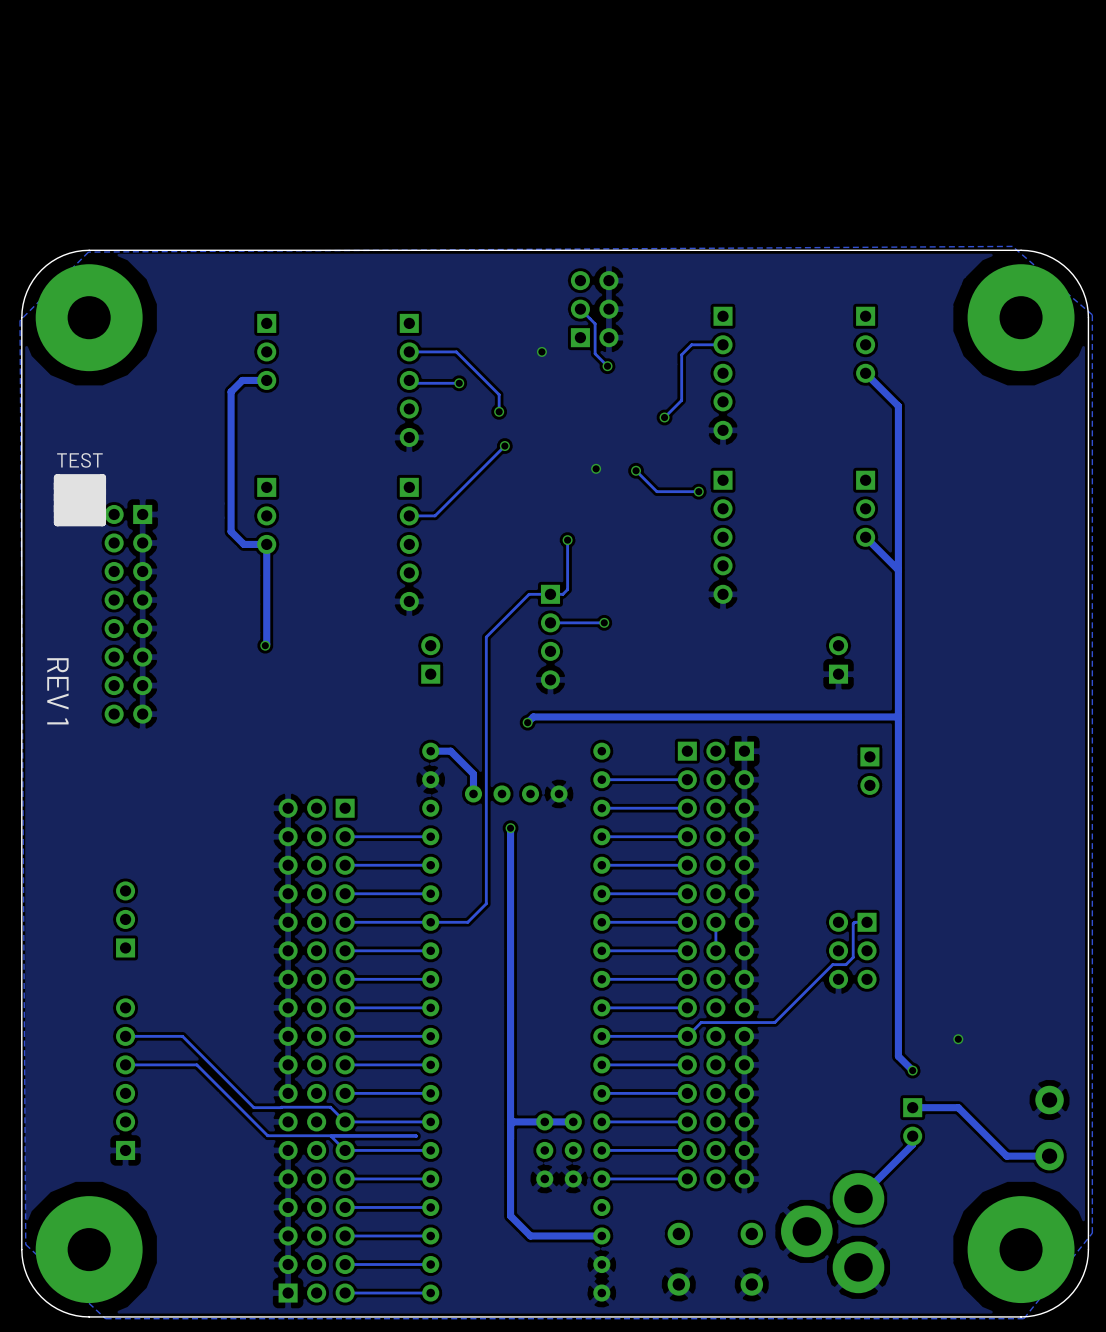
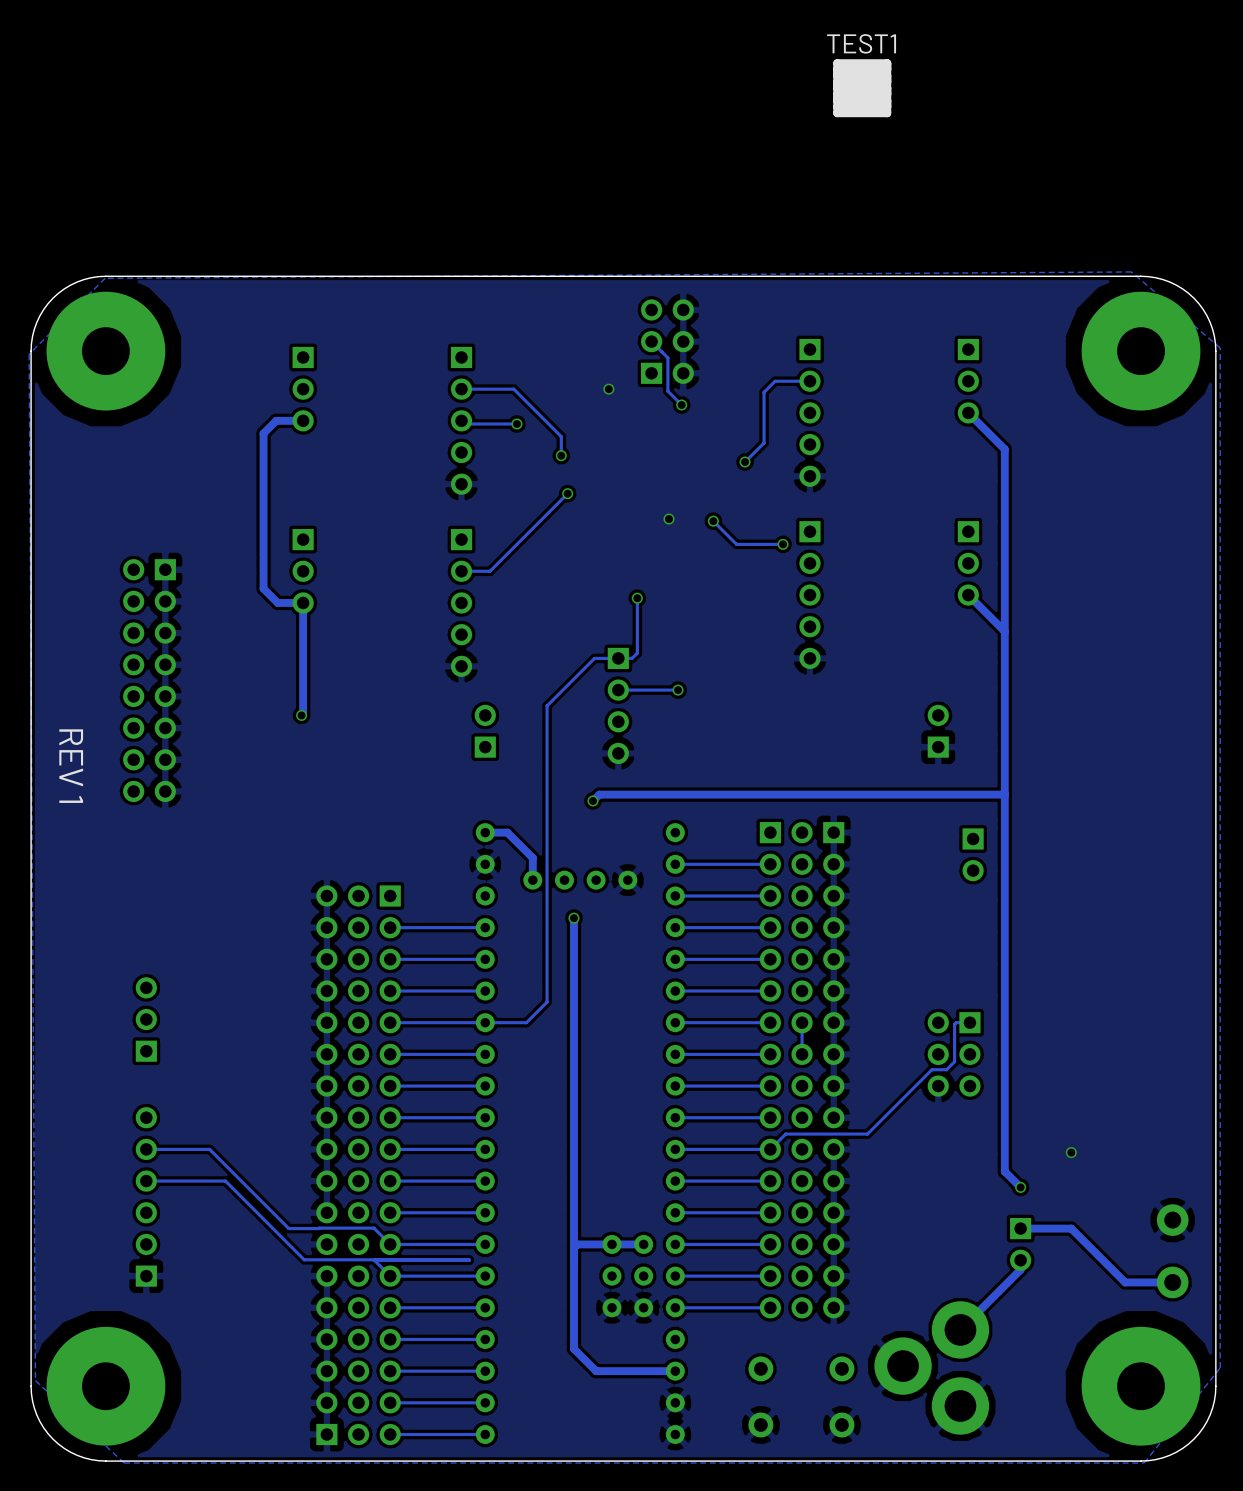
TEST1: none -> (862, 88)
TEST: (79, 500) -> none

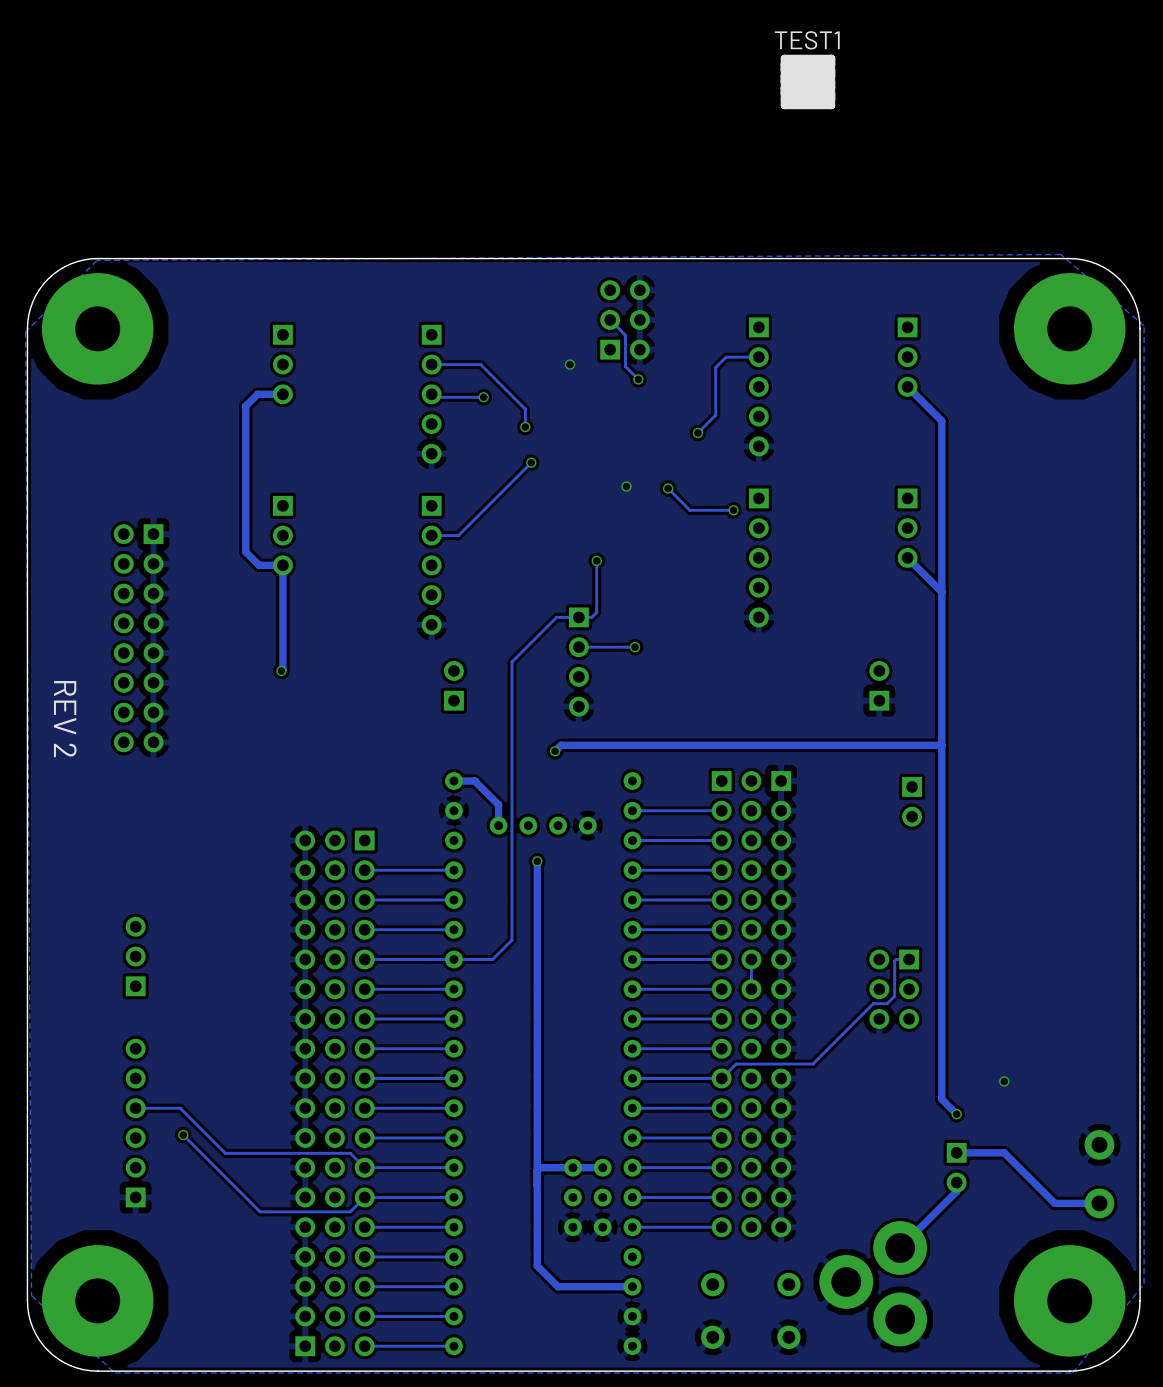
text: REV 1 (71, 766) -> REV 2 (65, 719)
track: (146, 1149) (209, 1149) (288, 1228) (374, 1229) -> (180, 1108) (225, 1153) (350, 1153)
track: (193, 1181) (225, 1181) (304, 1259) (469, 1260) (374, 1260) (390, 1276) -> (183, 1135) (260, 1211) (350, 1211) (364, 1197)
via: none -> (183, 1135)

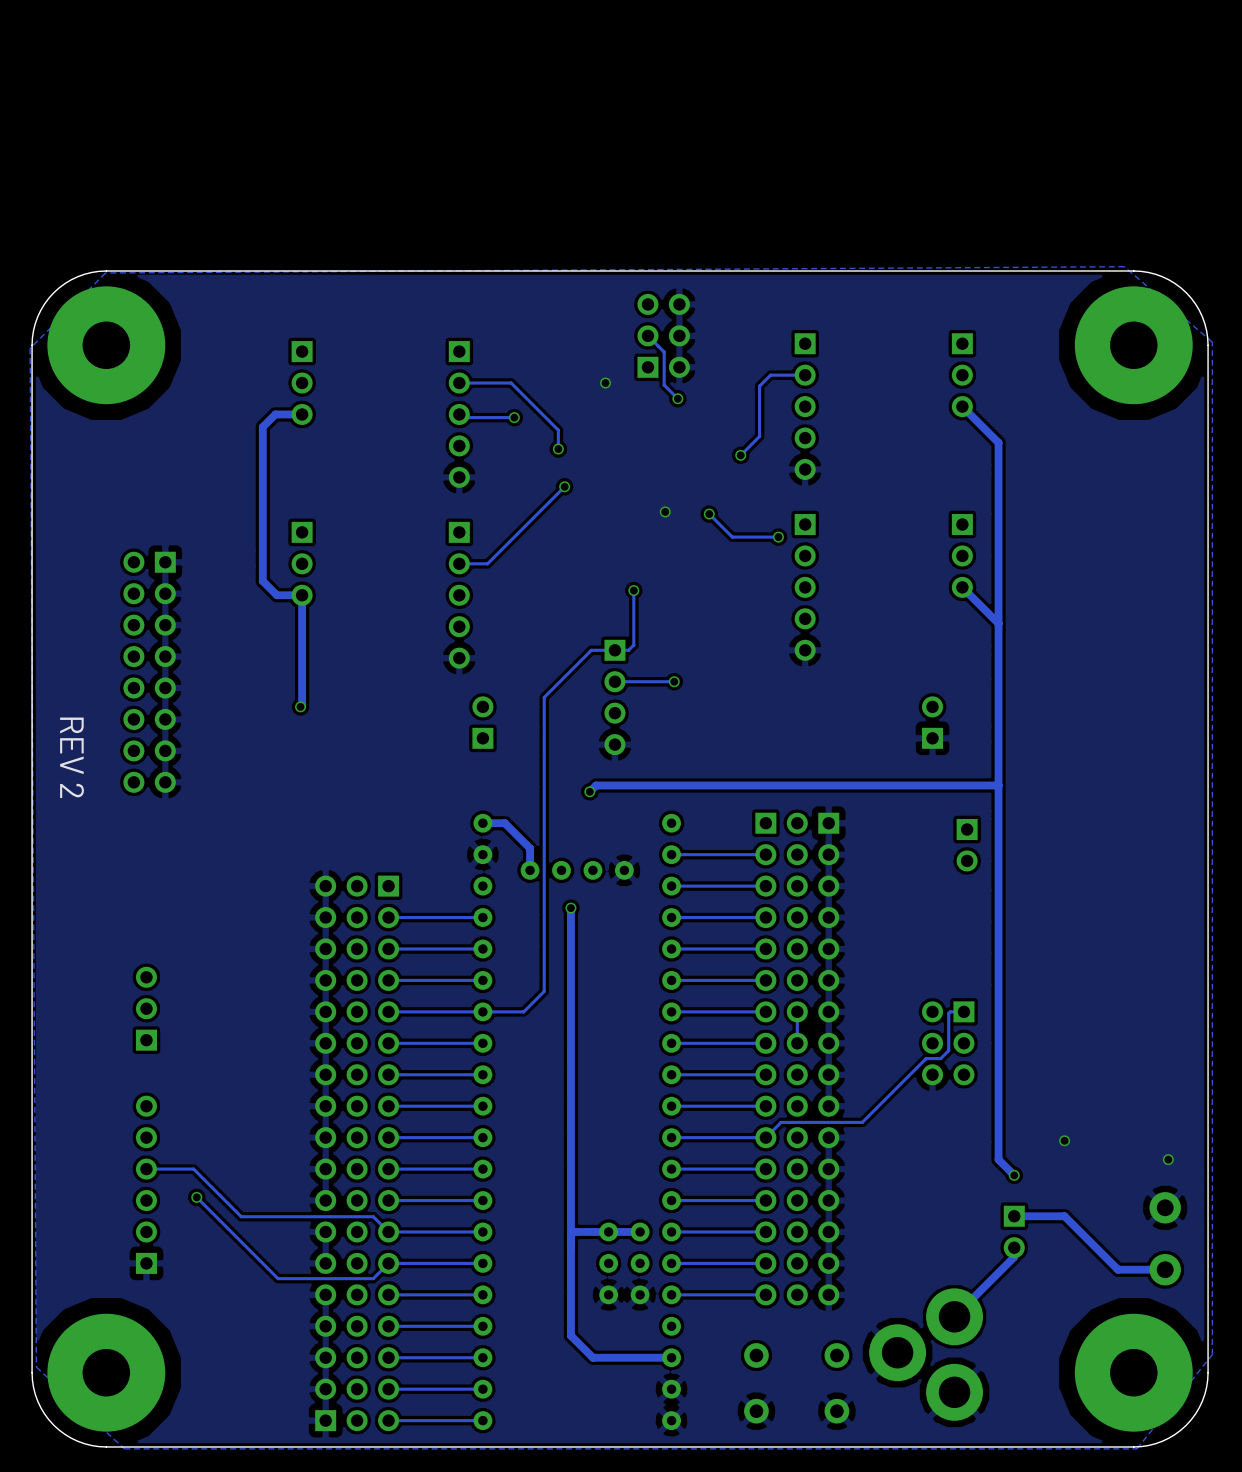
TEST1: (807, 81) -> none
via: none -> (1168, 1159)

